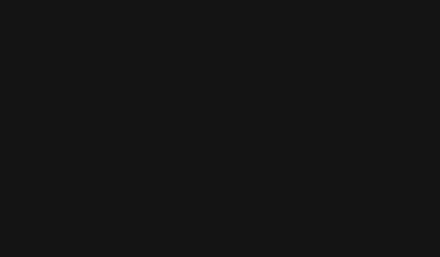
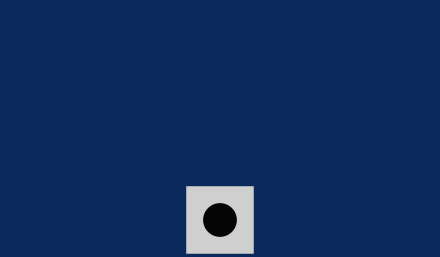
part: none -> (219, 219)

